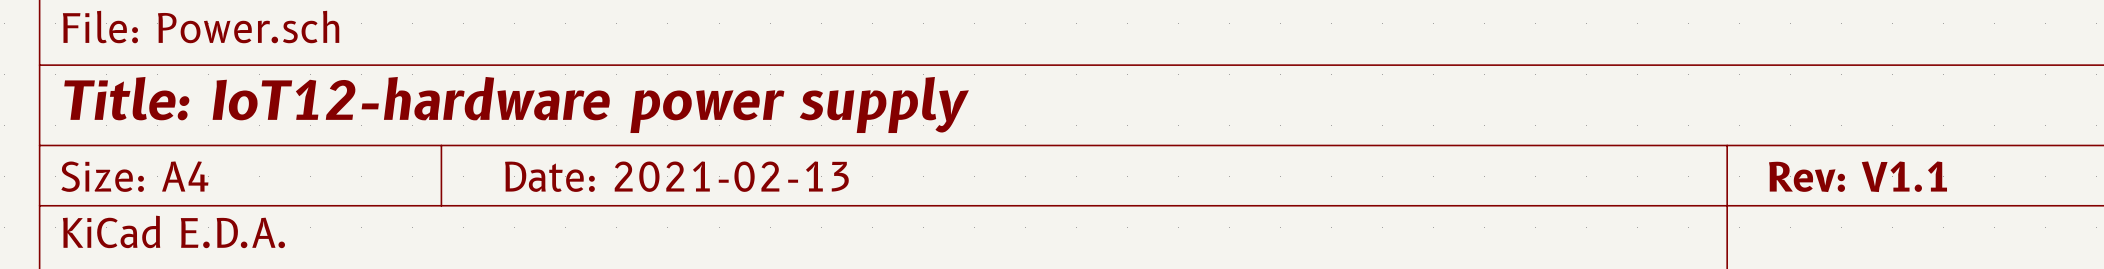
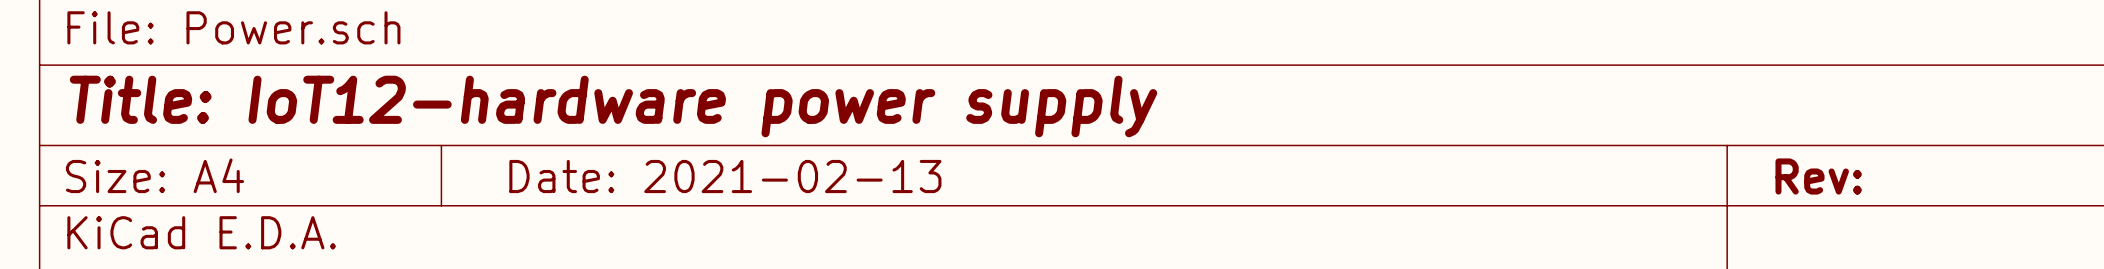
title block: Rev: V1.1 (1858, 176) -> Rev: (1818, 176)

